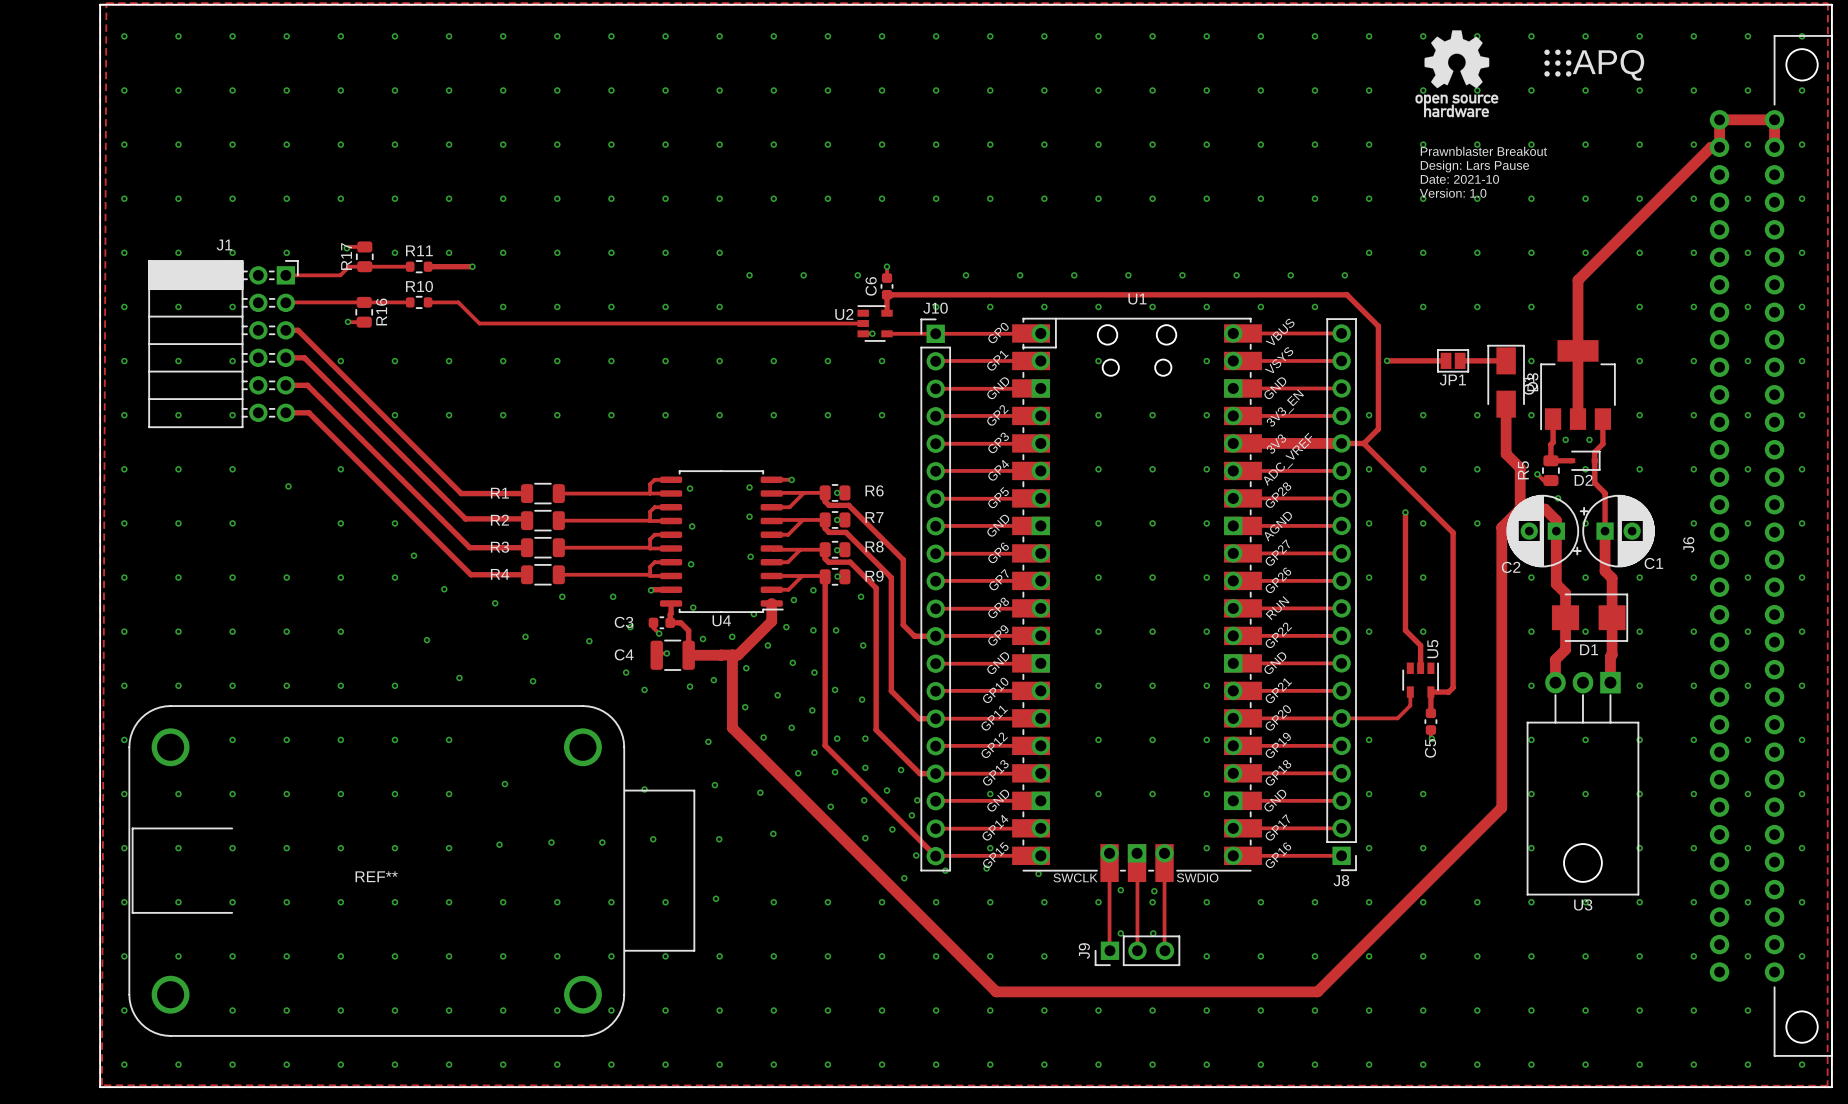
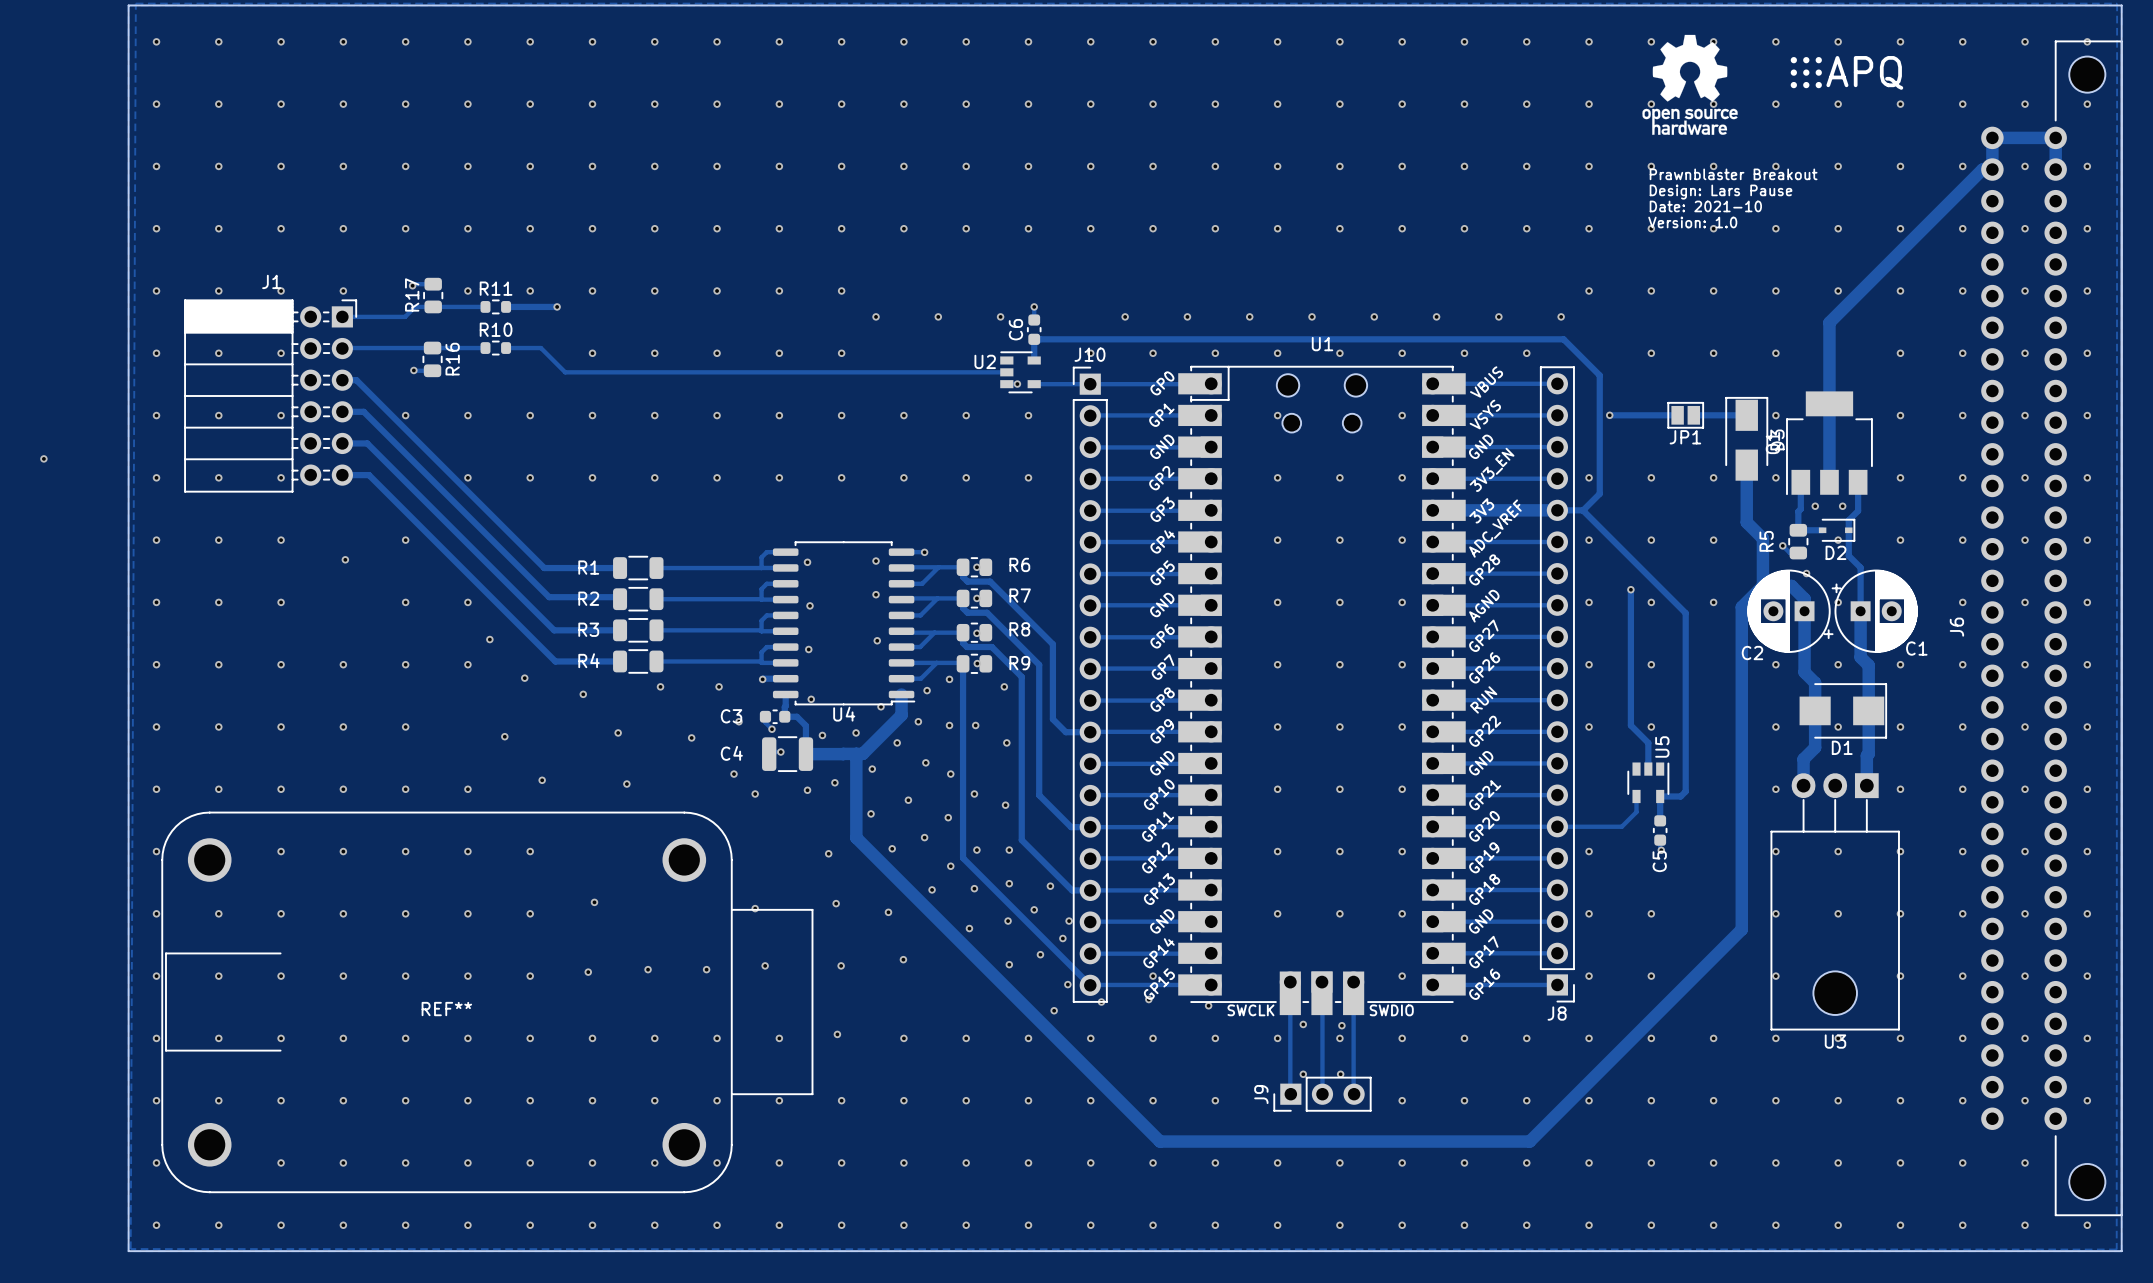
via: none -> (43, 458)
via: (990, 794) -> none

